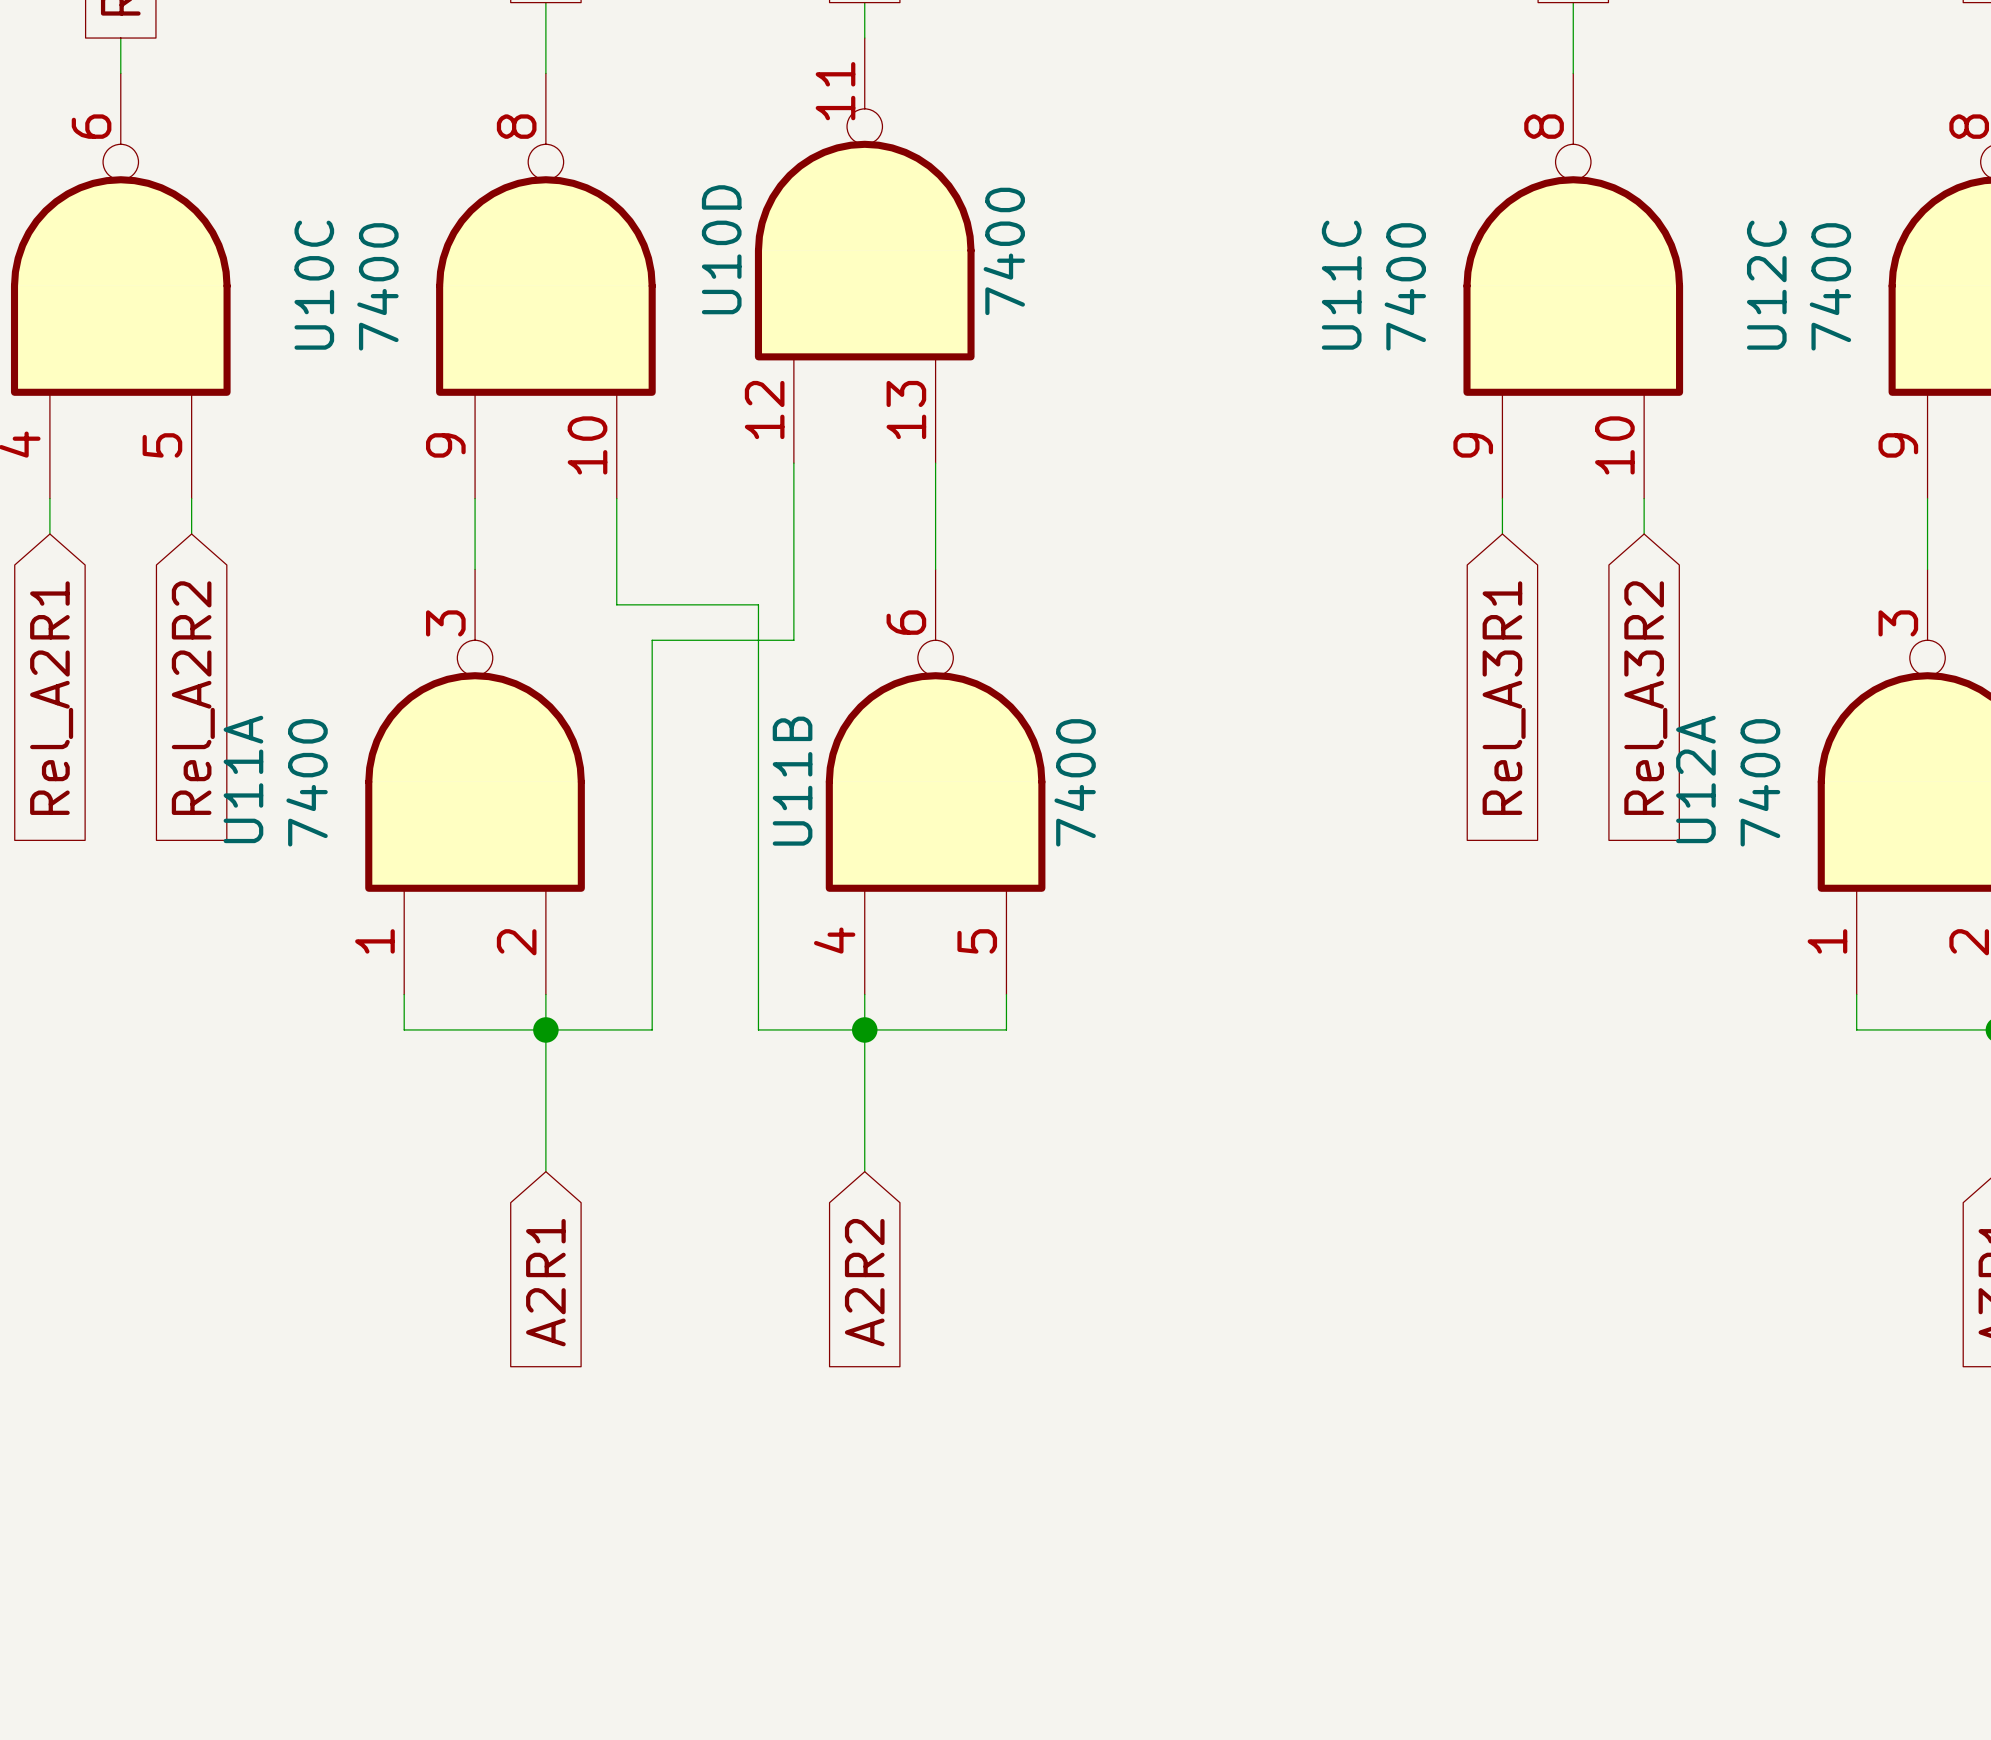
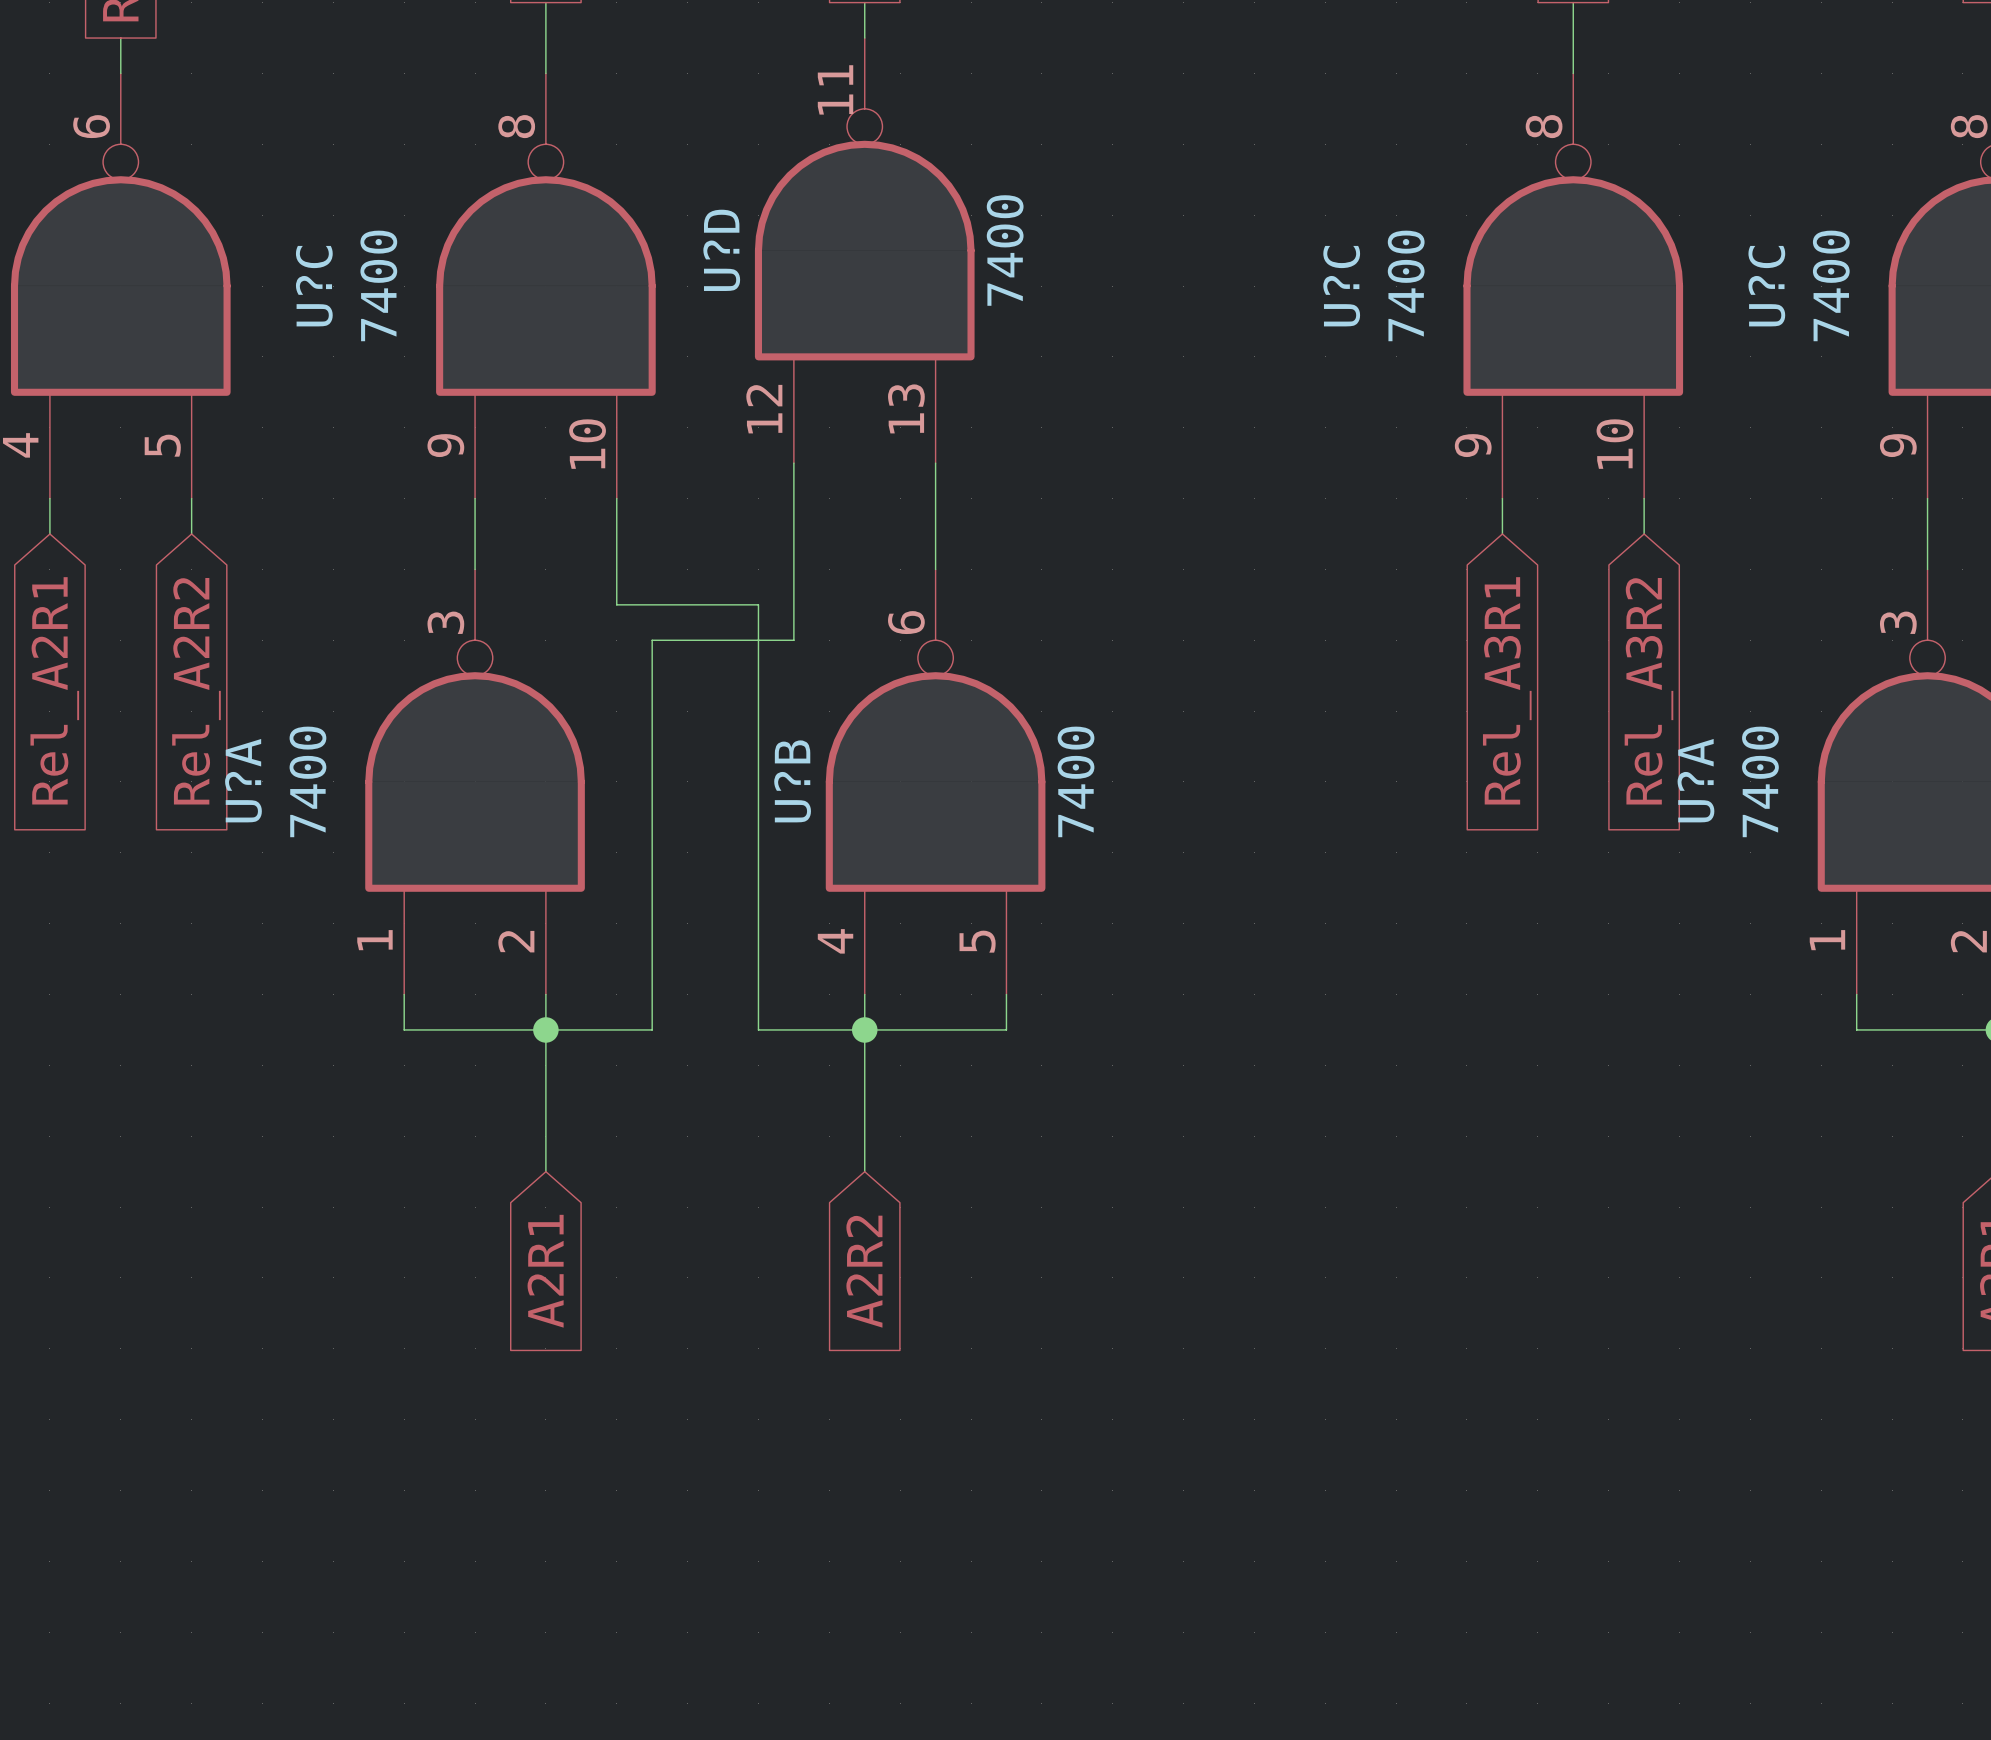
U10D name: U10D (721, 249) -> U?D (721, 250)
U10C name: U10C (314, 285) -> U?C (314, 286)
U11C name: U11C (1341, 285) -> U?C (1341, 286)
U12C name: U12C (1766, 285) -> U?C (1766, 286)
U11A name: U11A (243, 779) -> U?A (243, 780)
U12A name: U12A (1695, 779) -> U?A (1695, 780)
U11B name: U11B (792, 781) -> U?B (792, 781)

